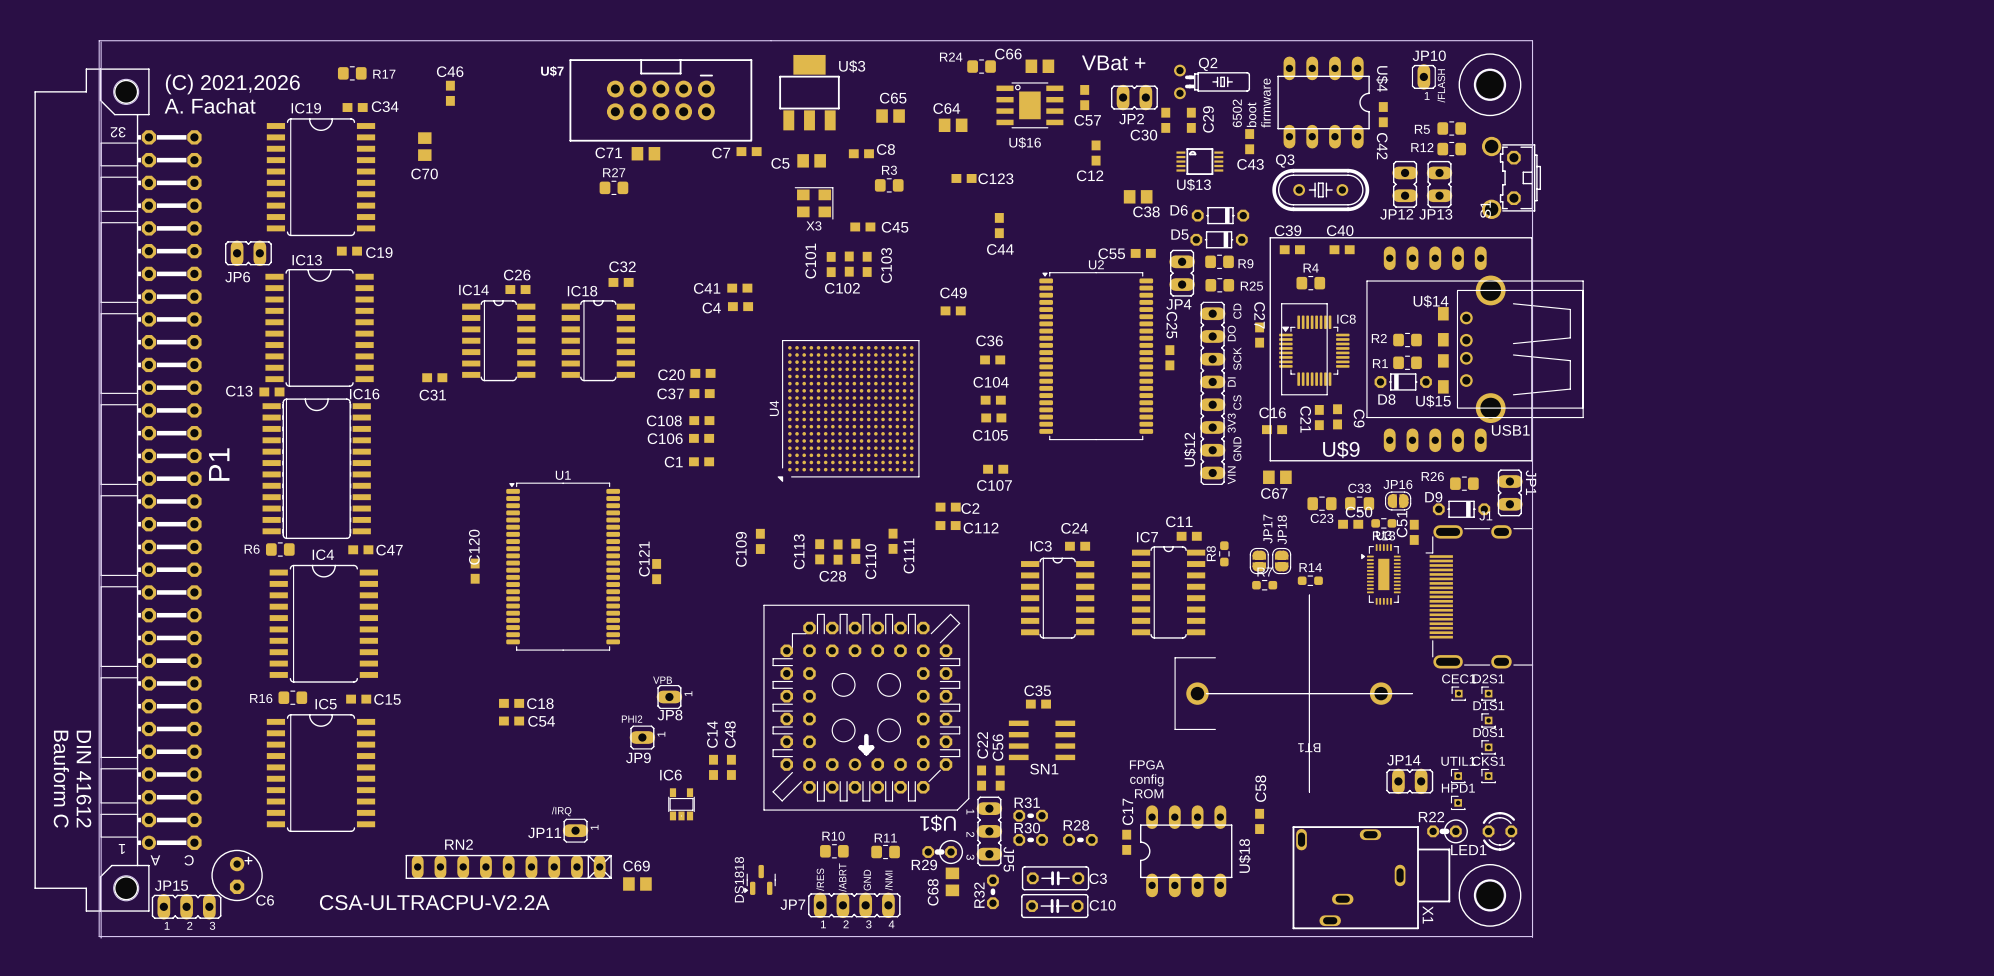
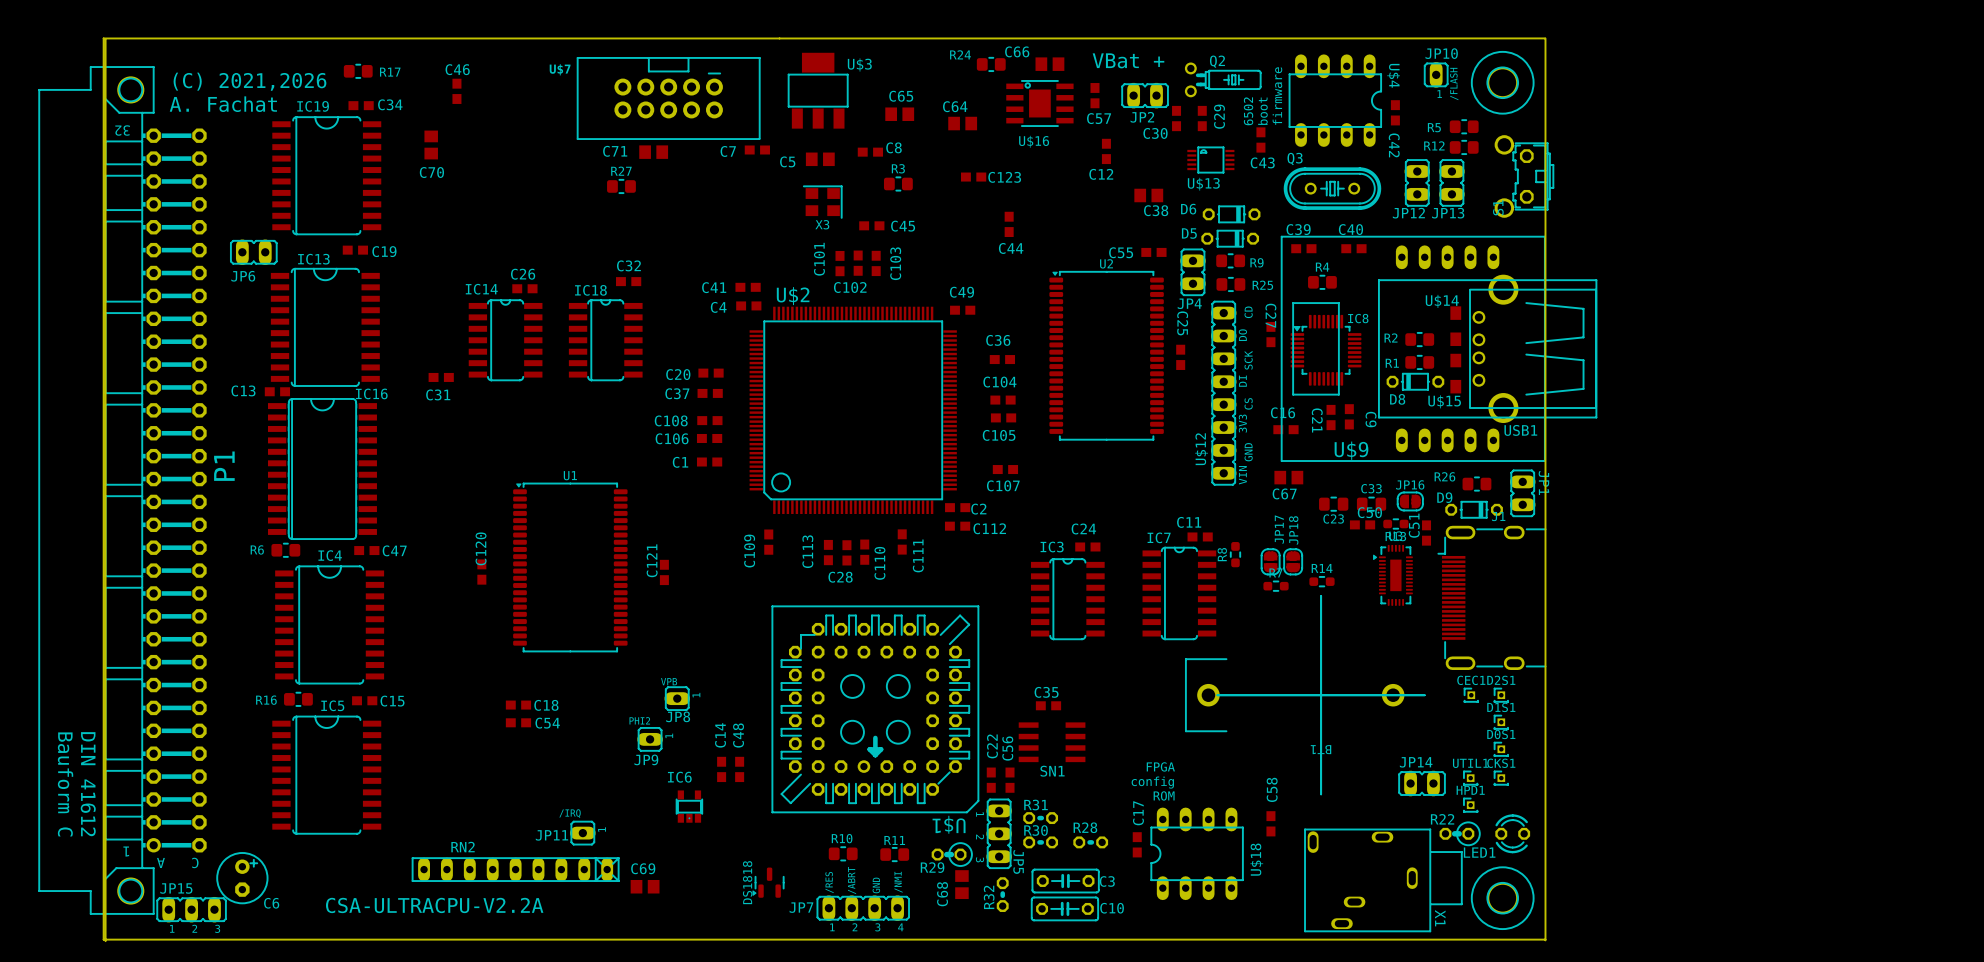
U$2: none -> (853, 410)
U4: (848, 410) -> none

